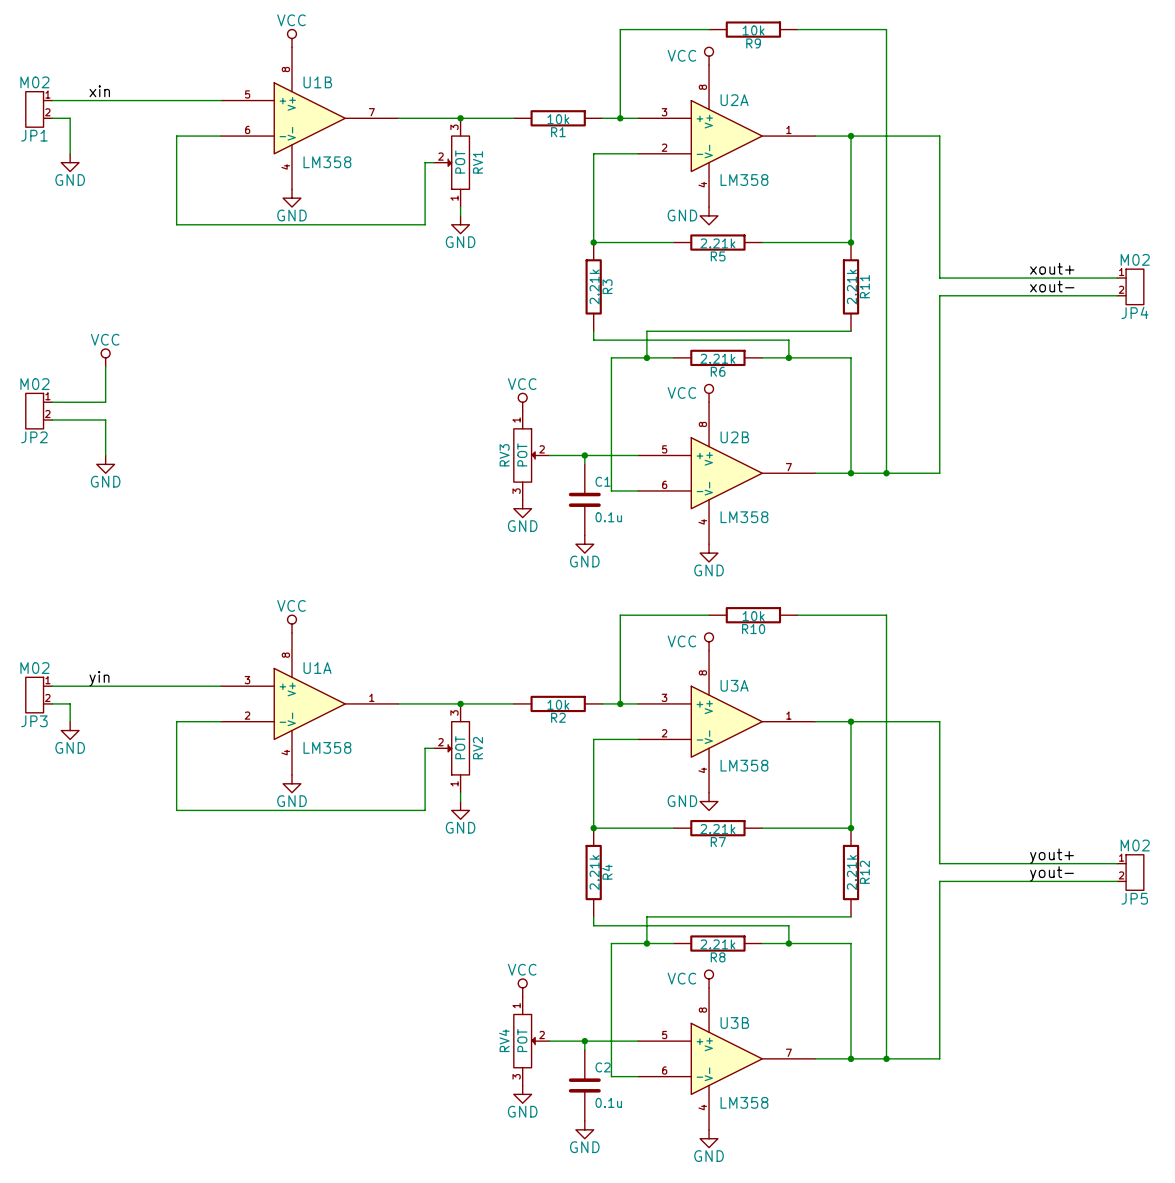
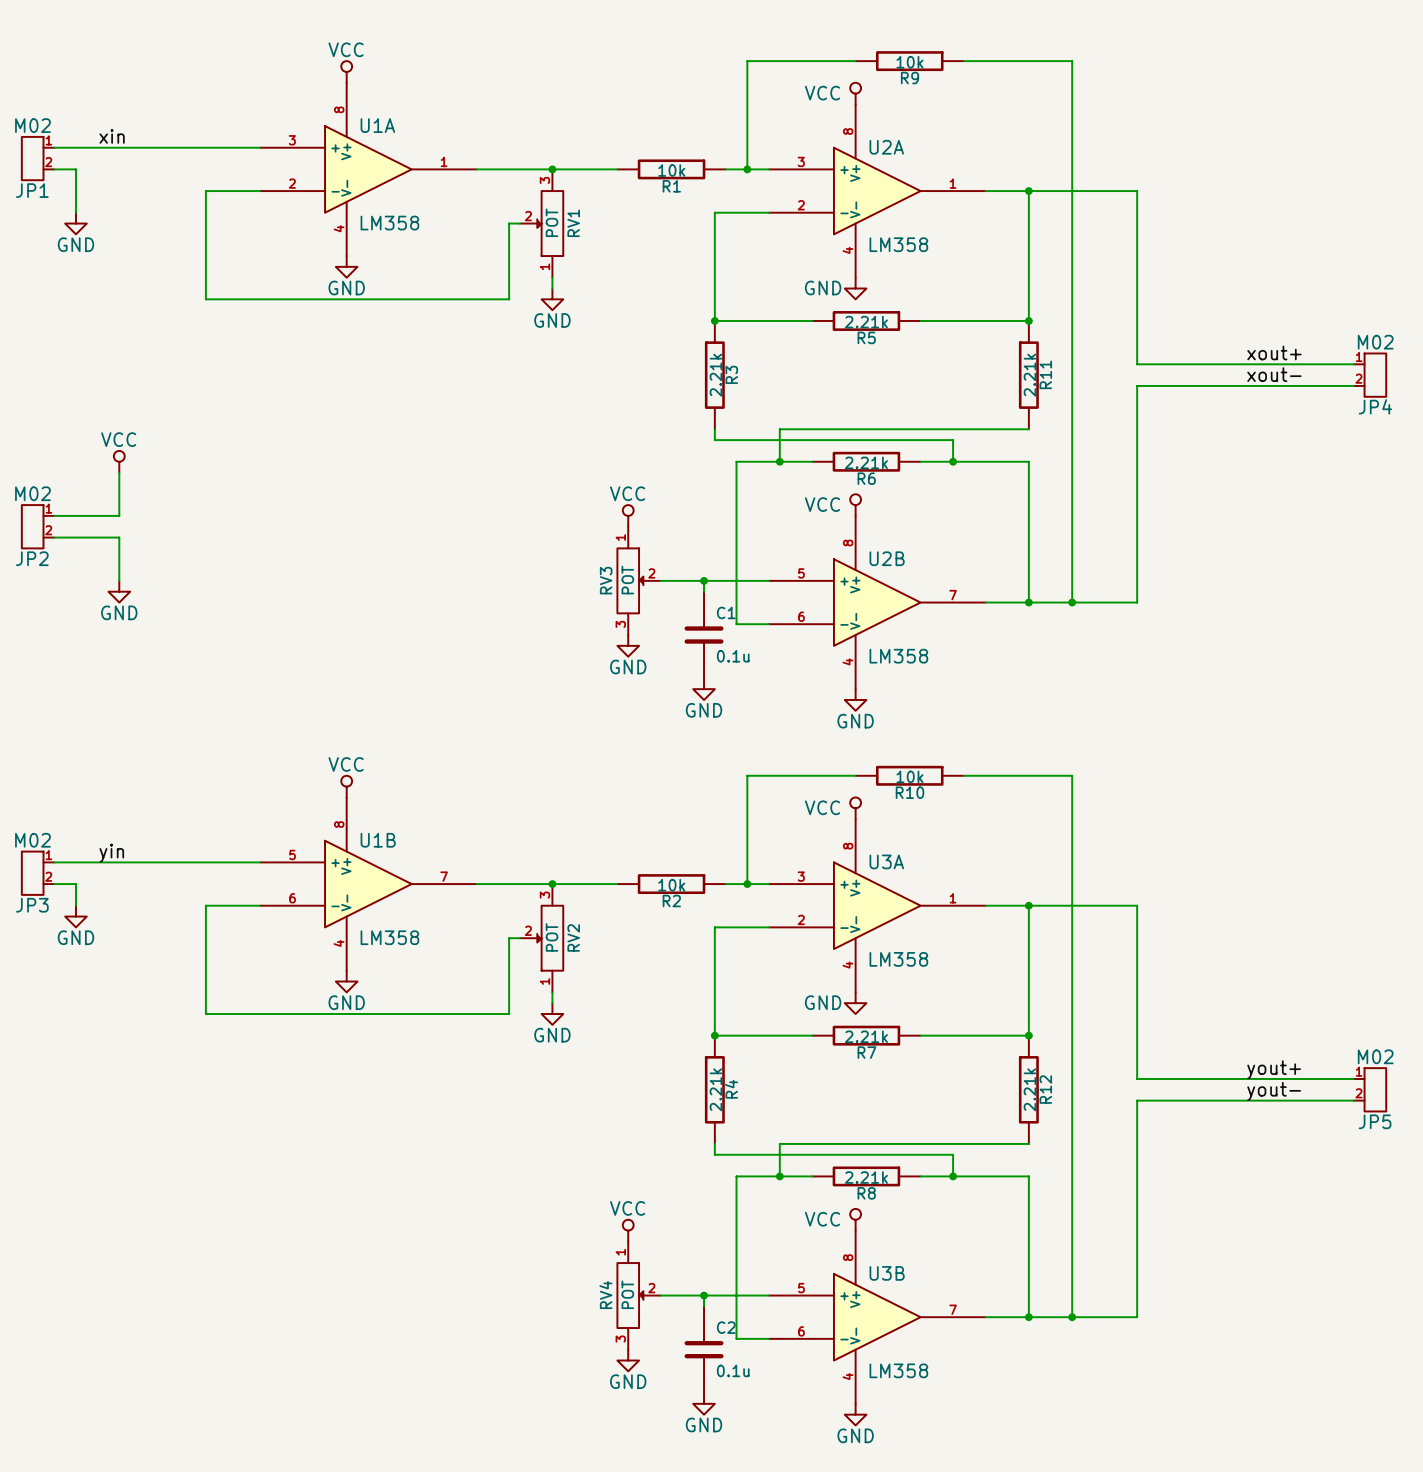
U1B position: (309, 118) -> (368, 884)
U1A position: (309, 703) -> (368, 169)

